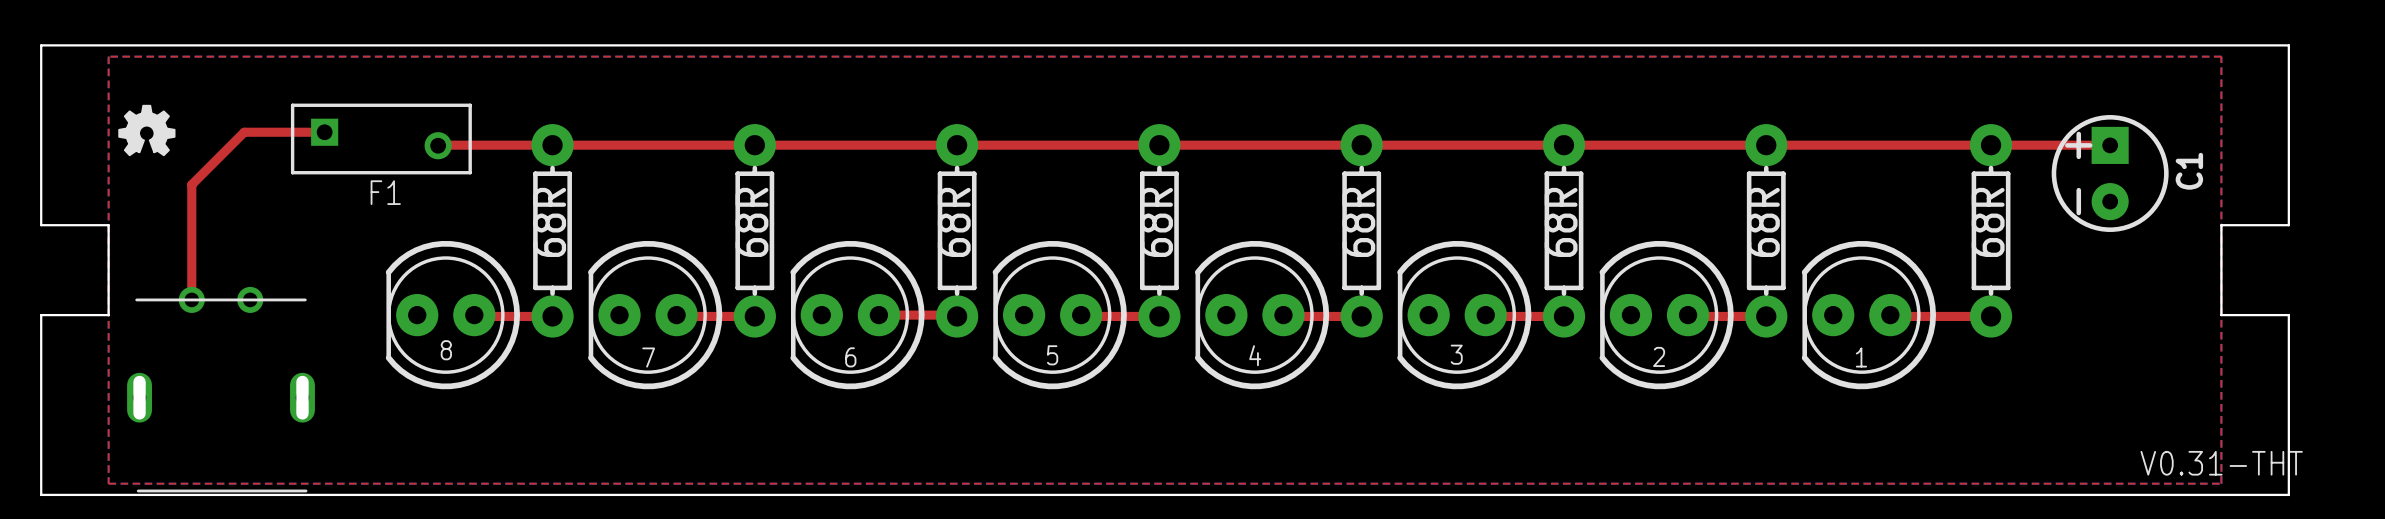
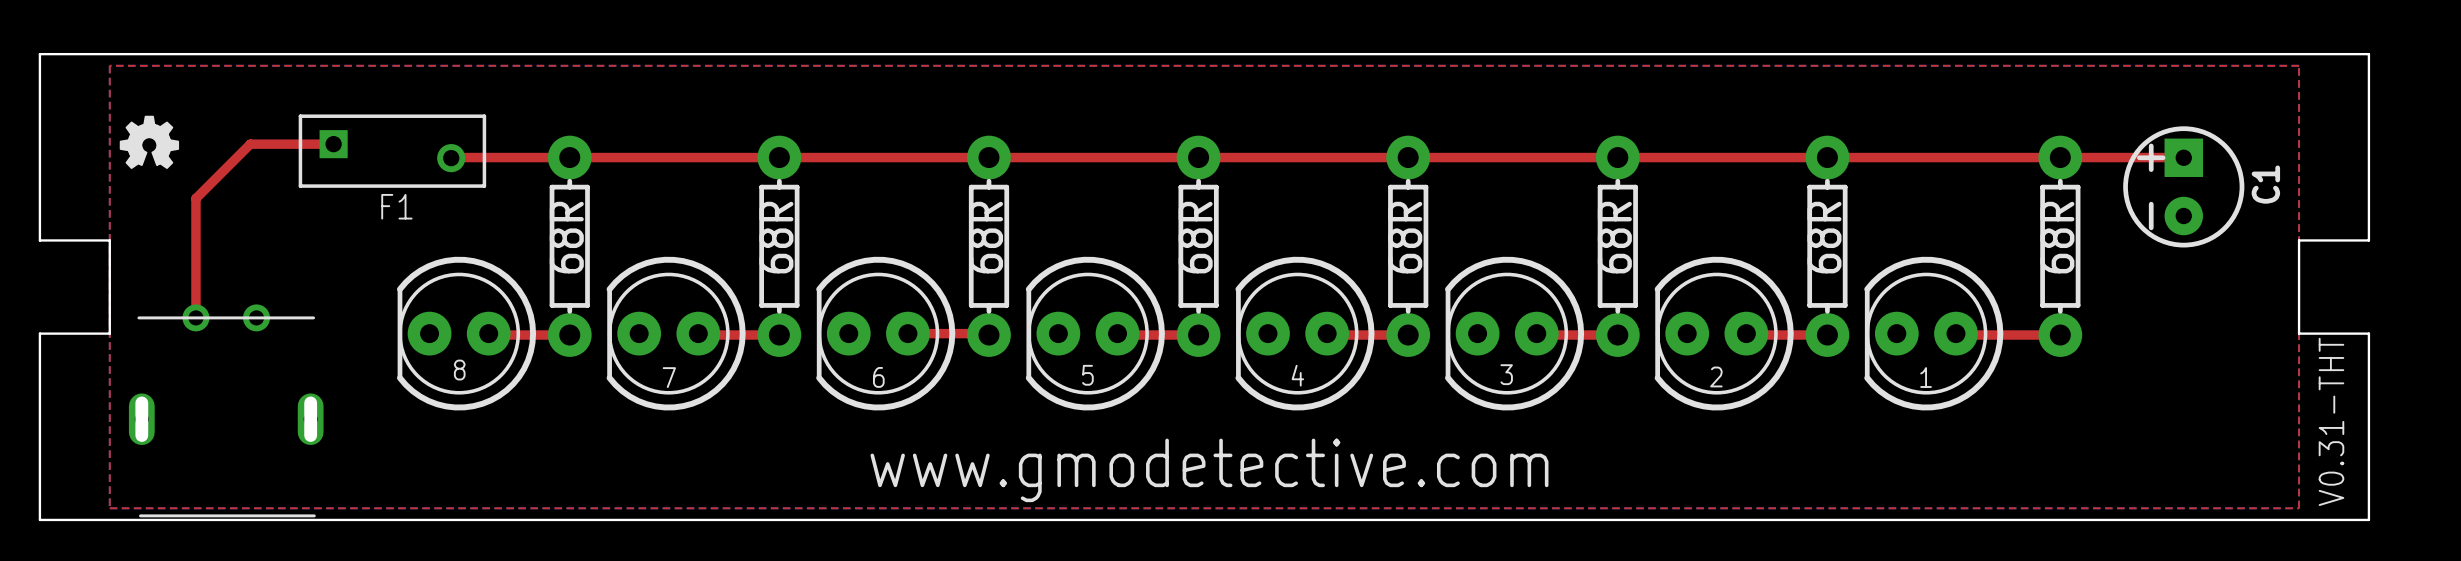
text: none -> www.gmodetective.com (1209, 470)
text rotation: 0° (2221, 463) -> 90° counterclockwise (2331, 421)

